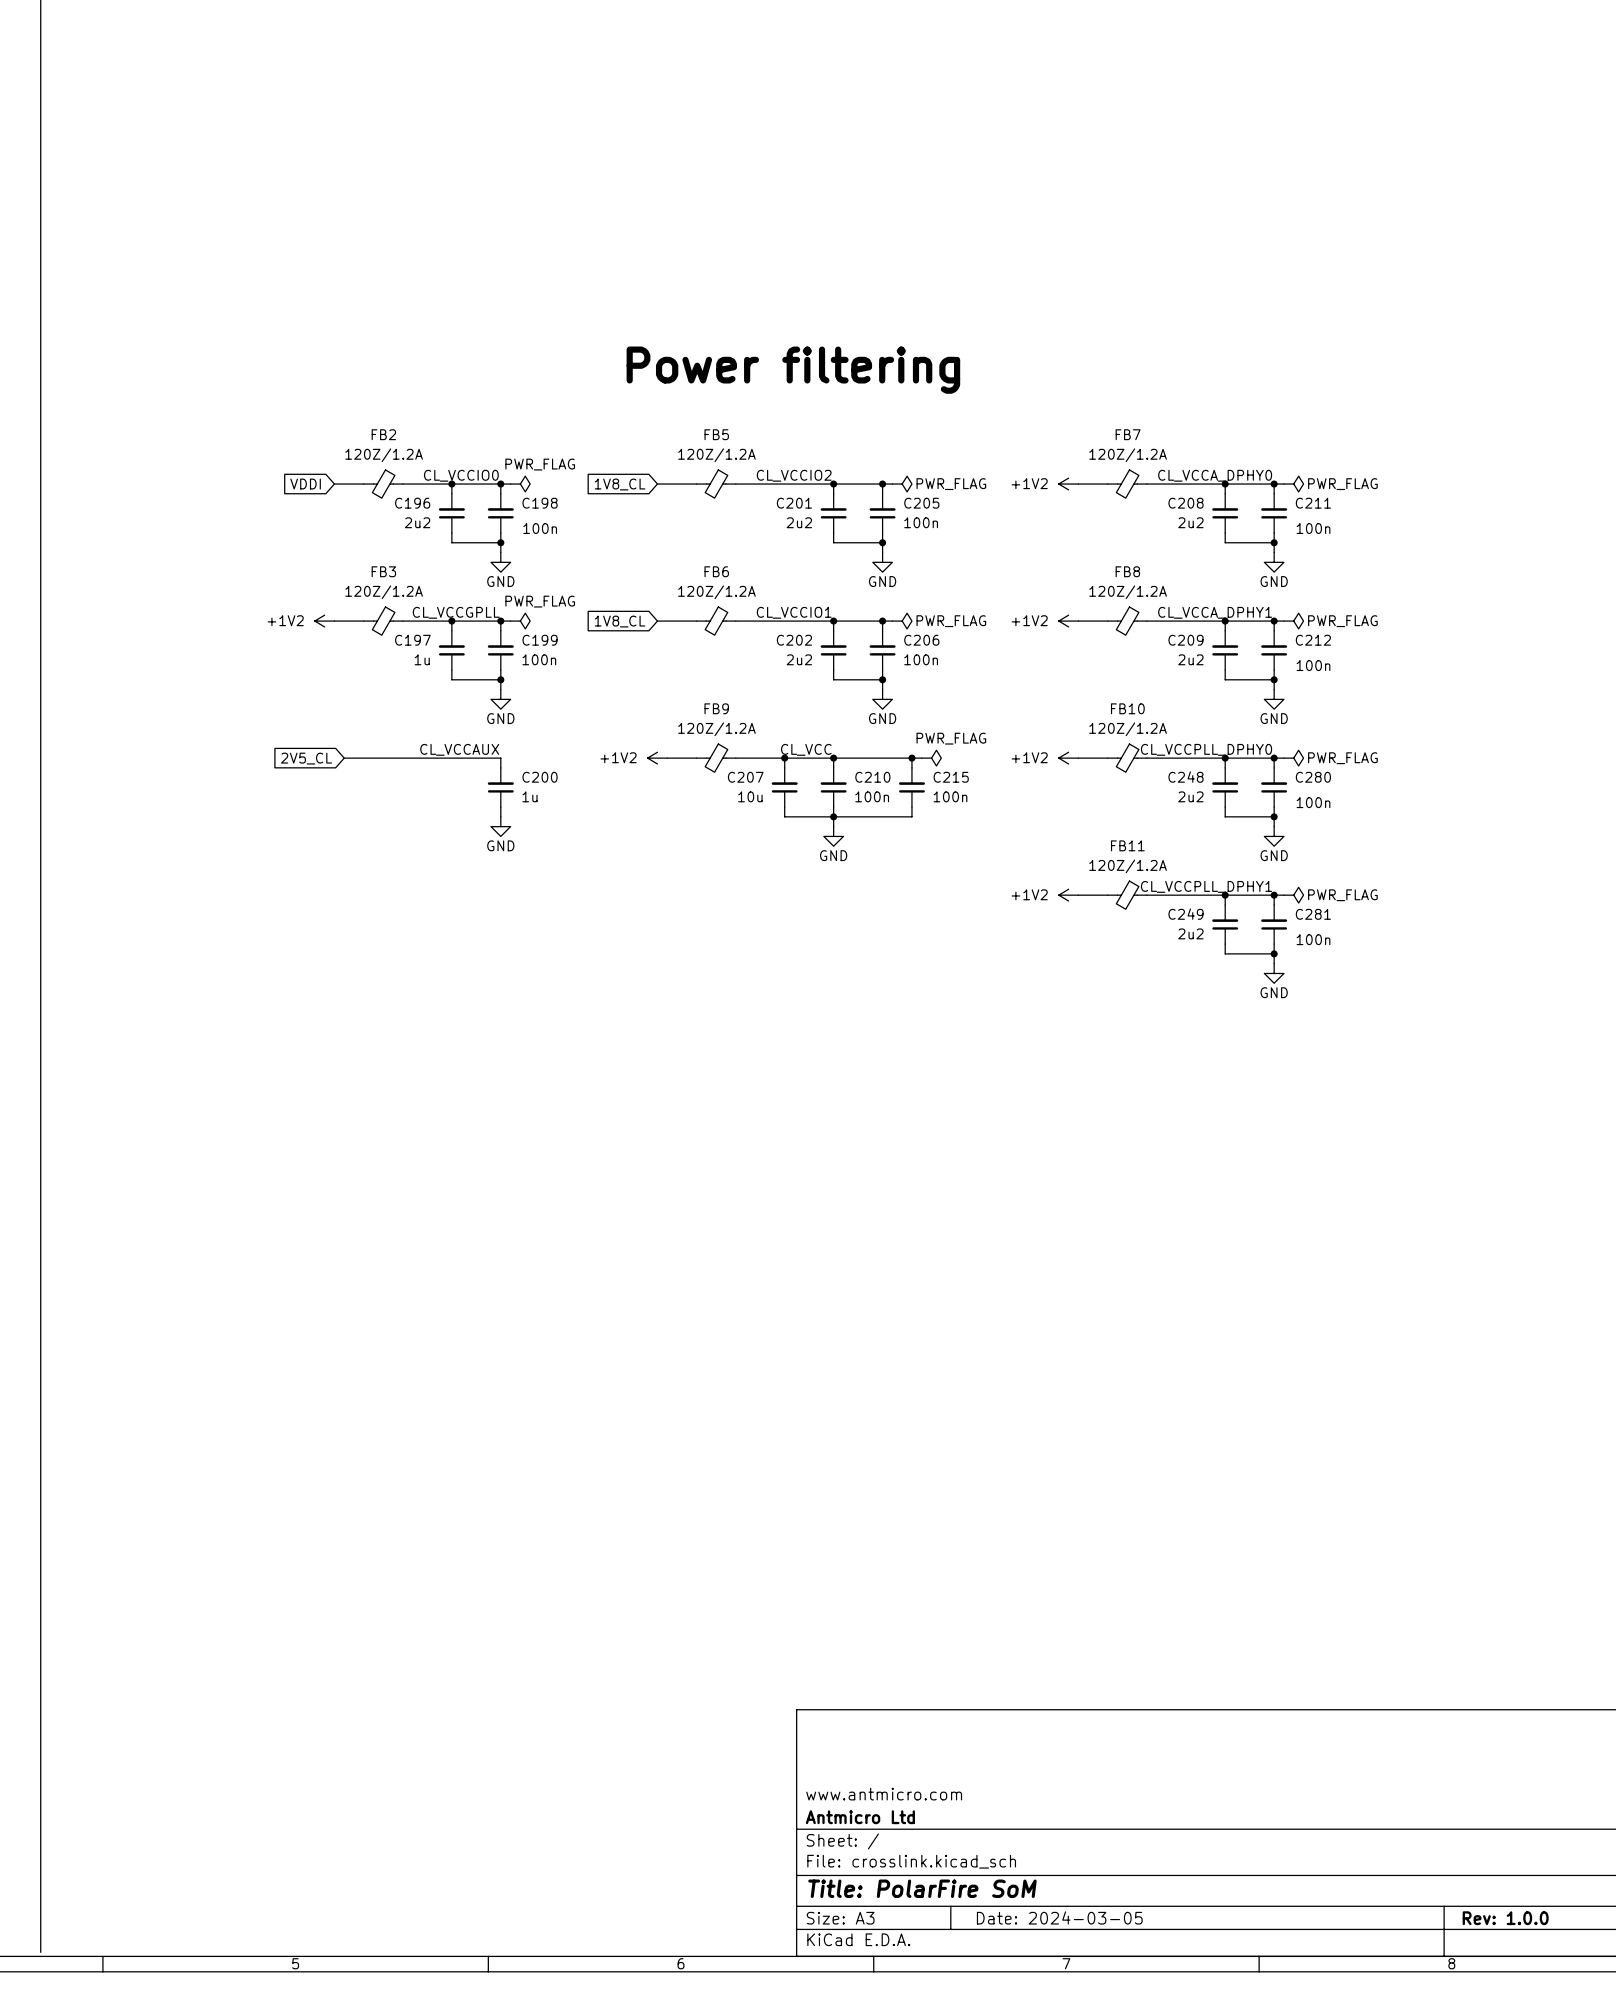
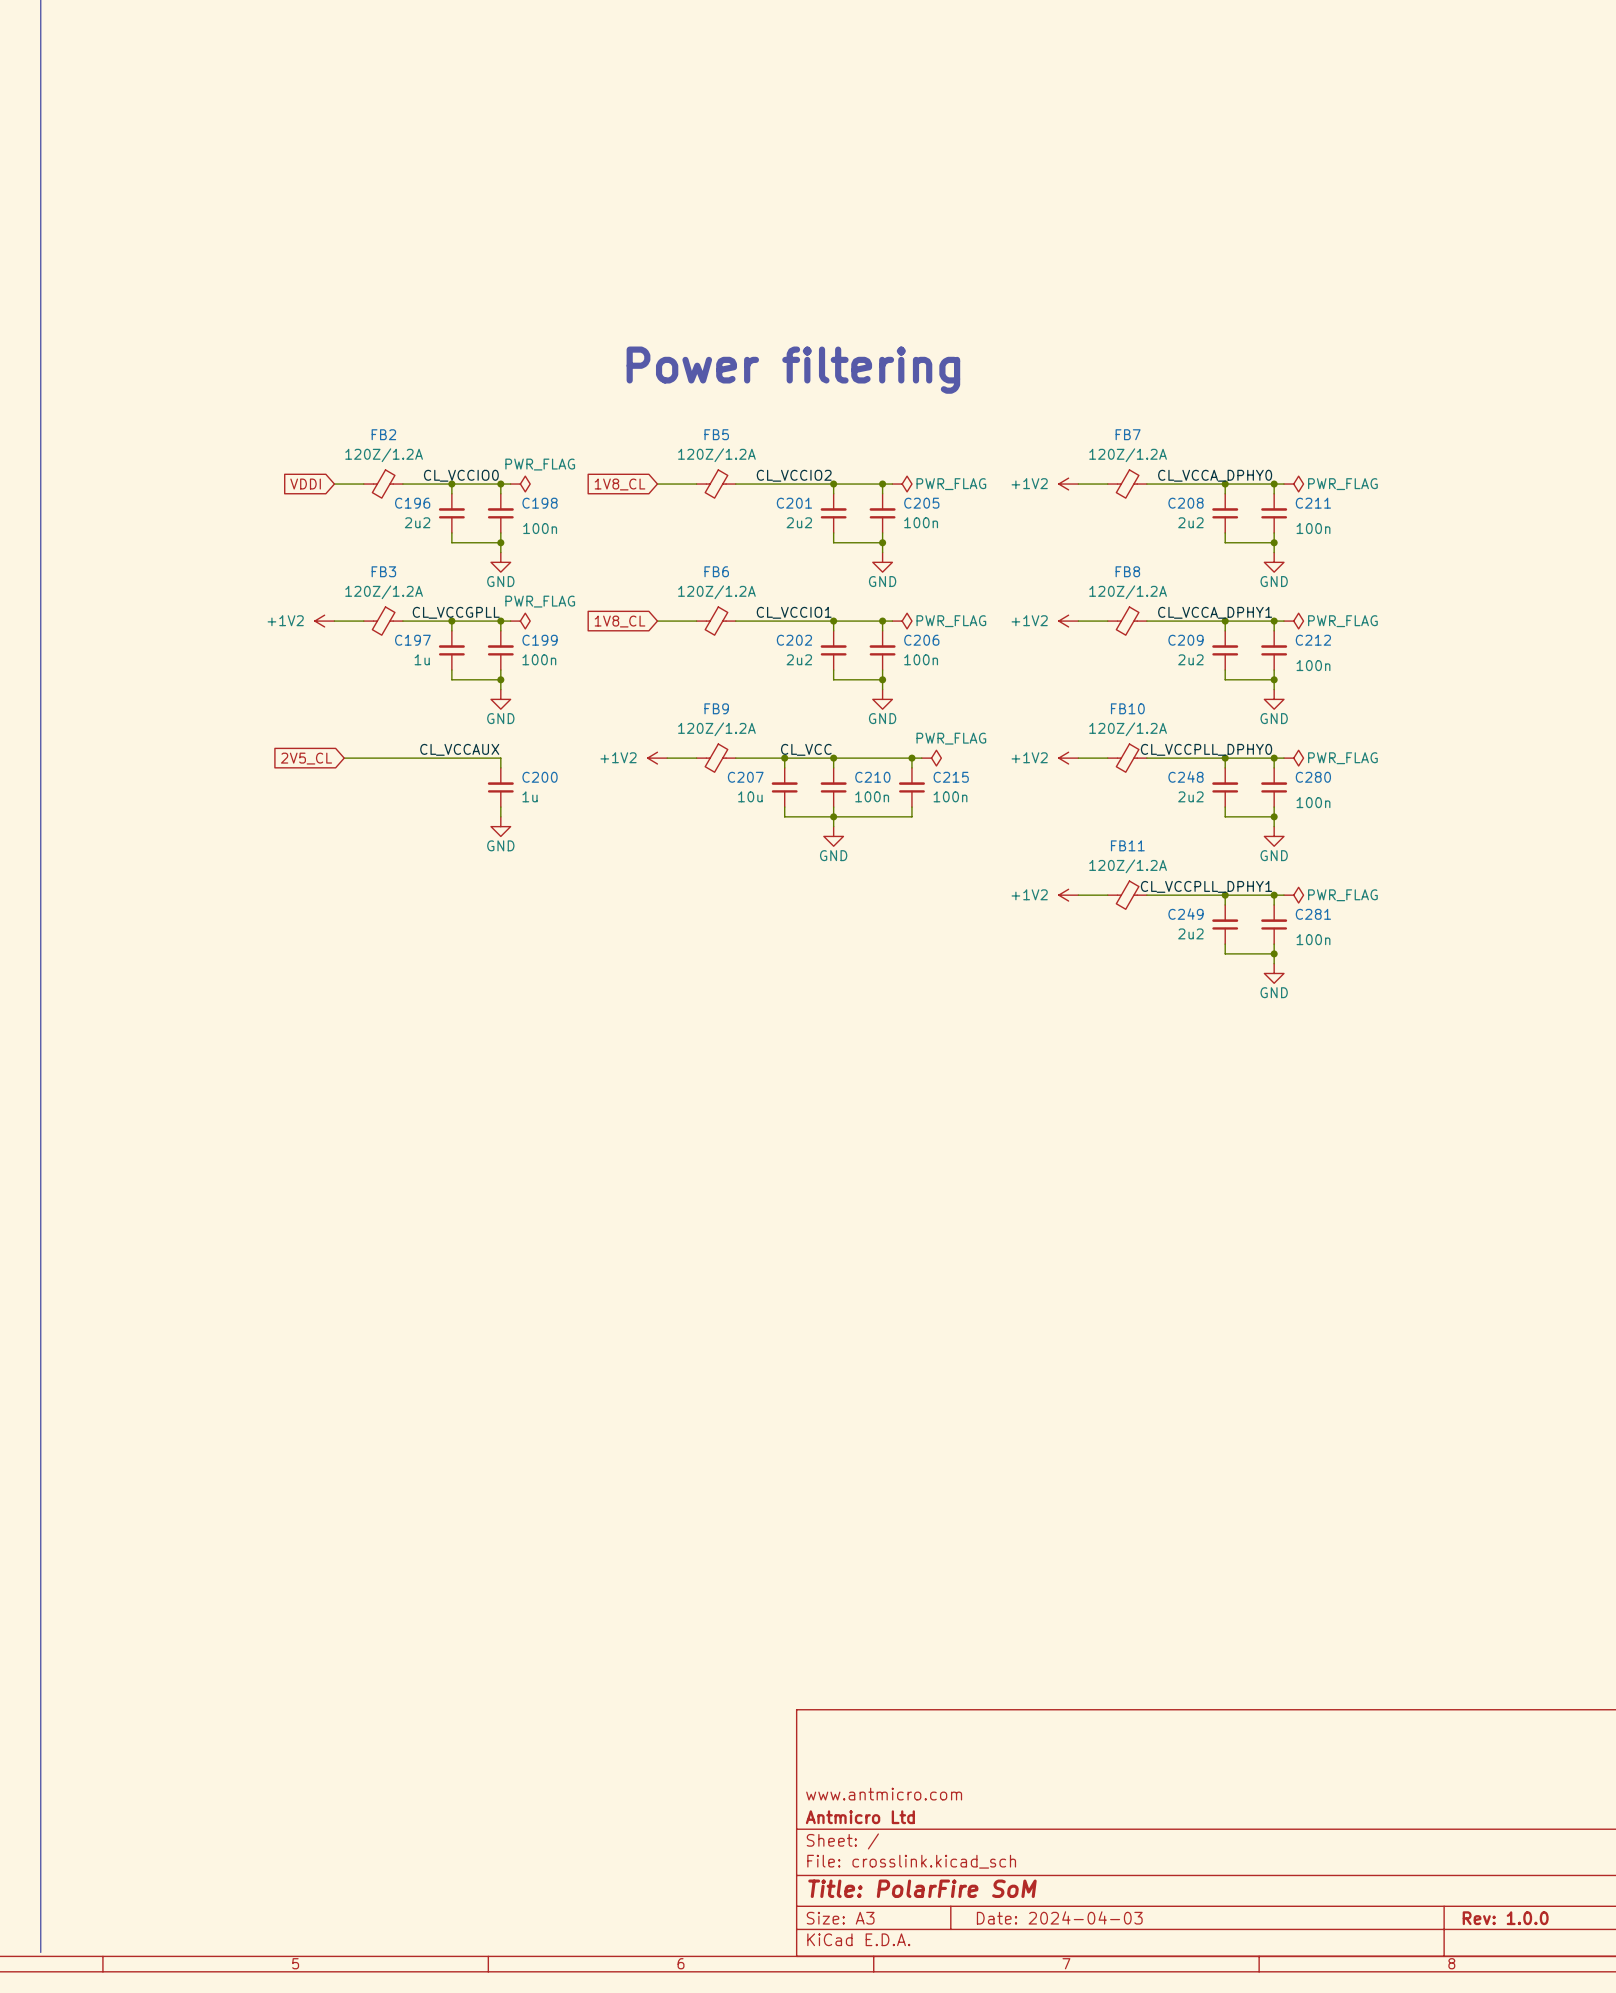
title block: Date: 2024-03-05 (1059, 1917) -> Date: 2024-04-03 (1059, 1917)

